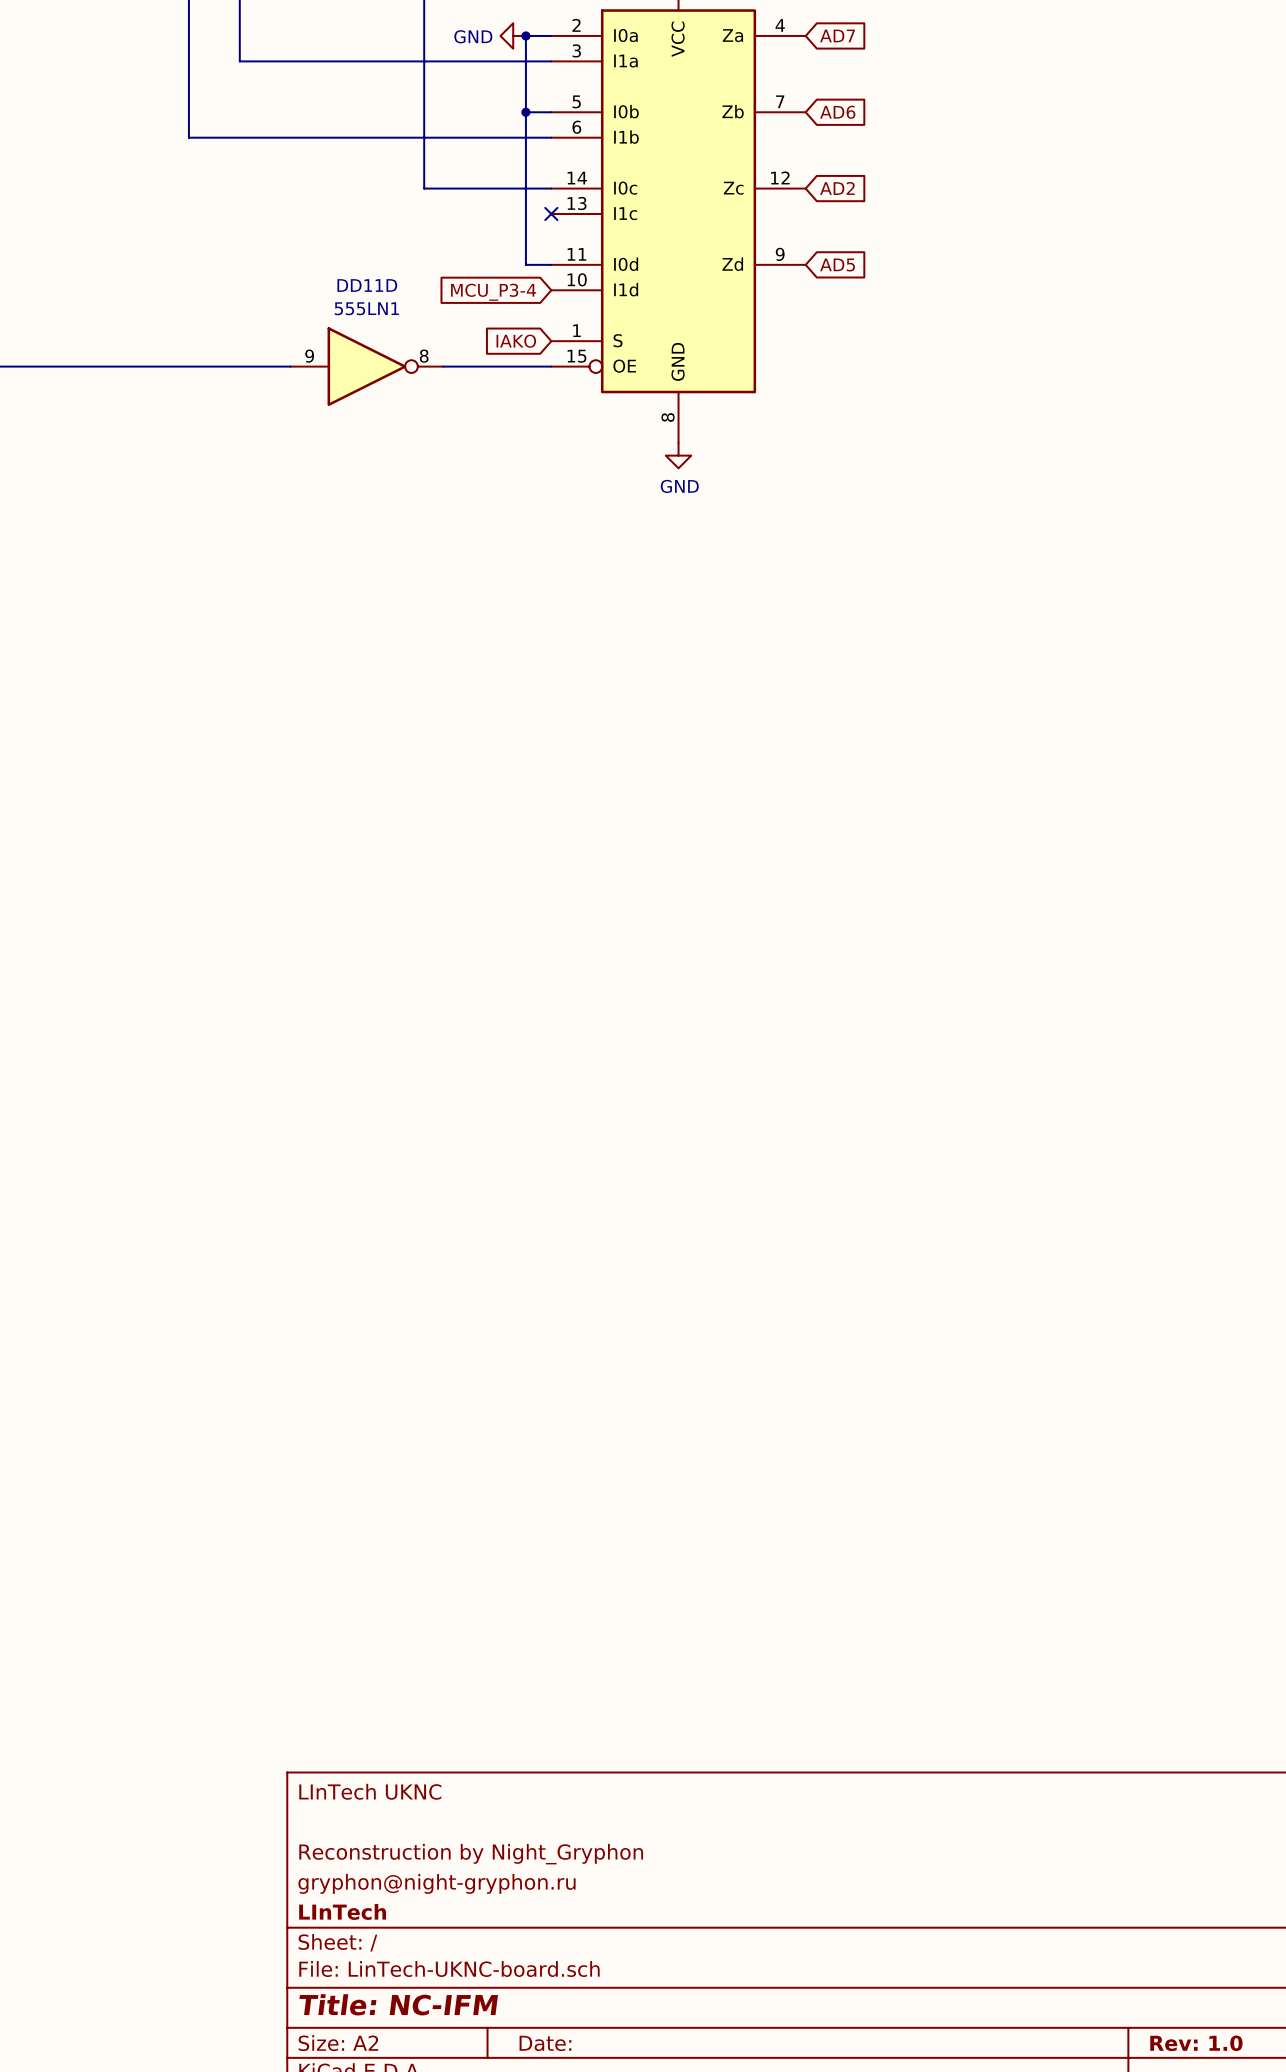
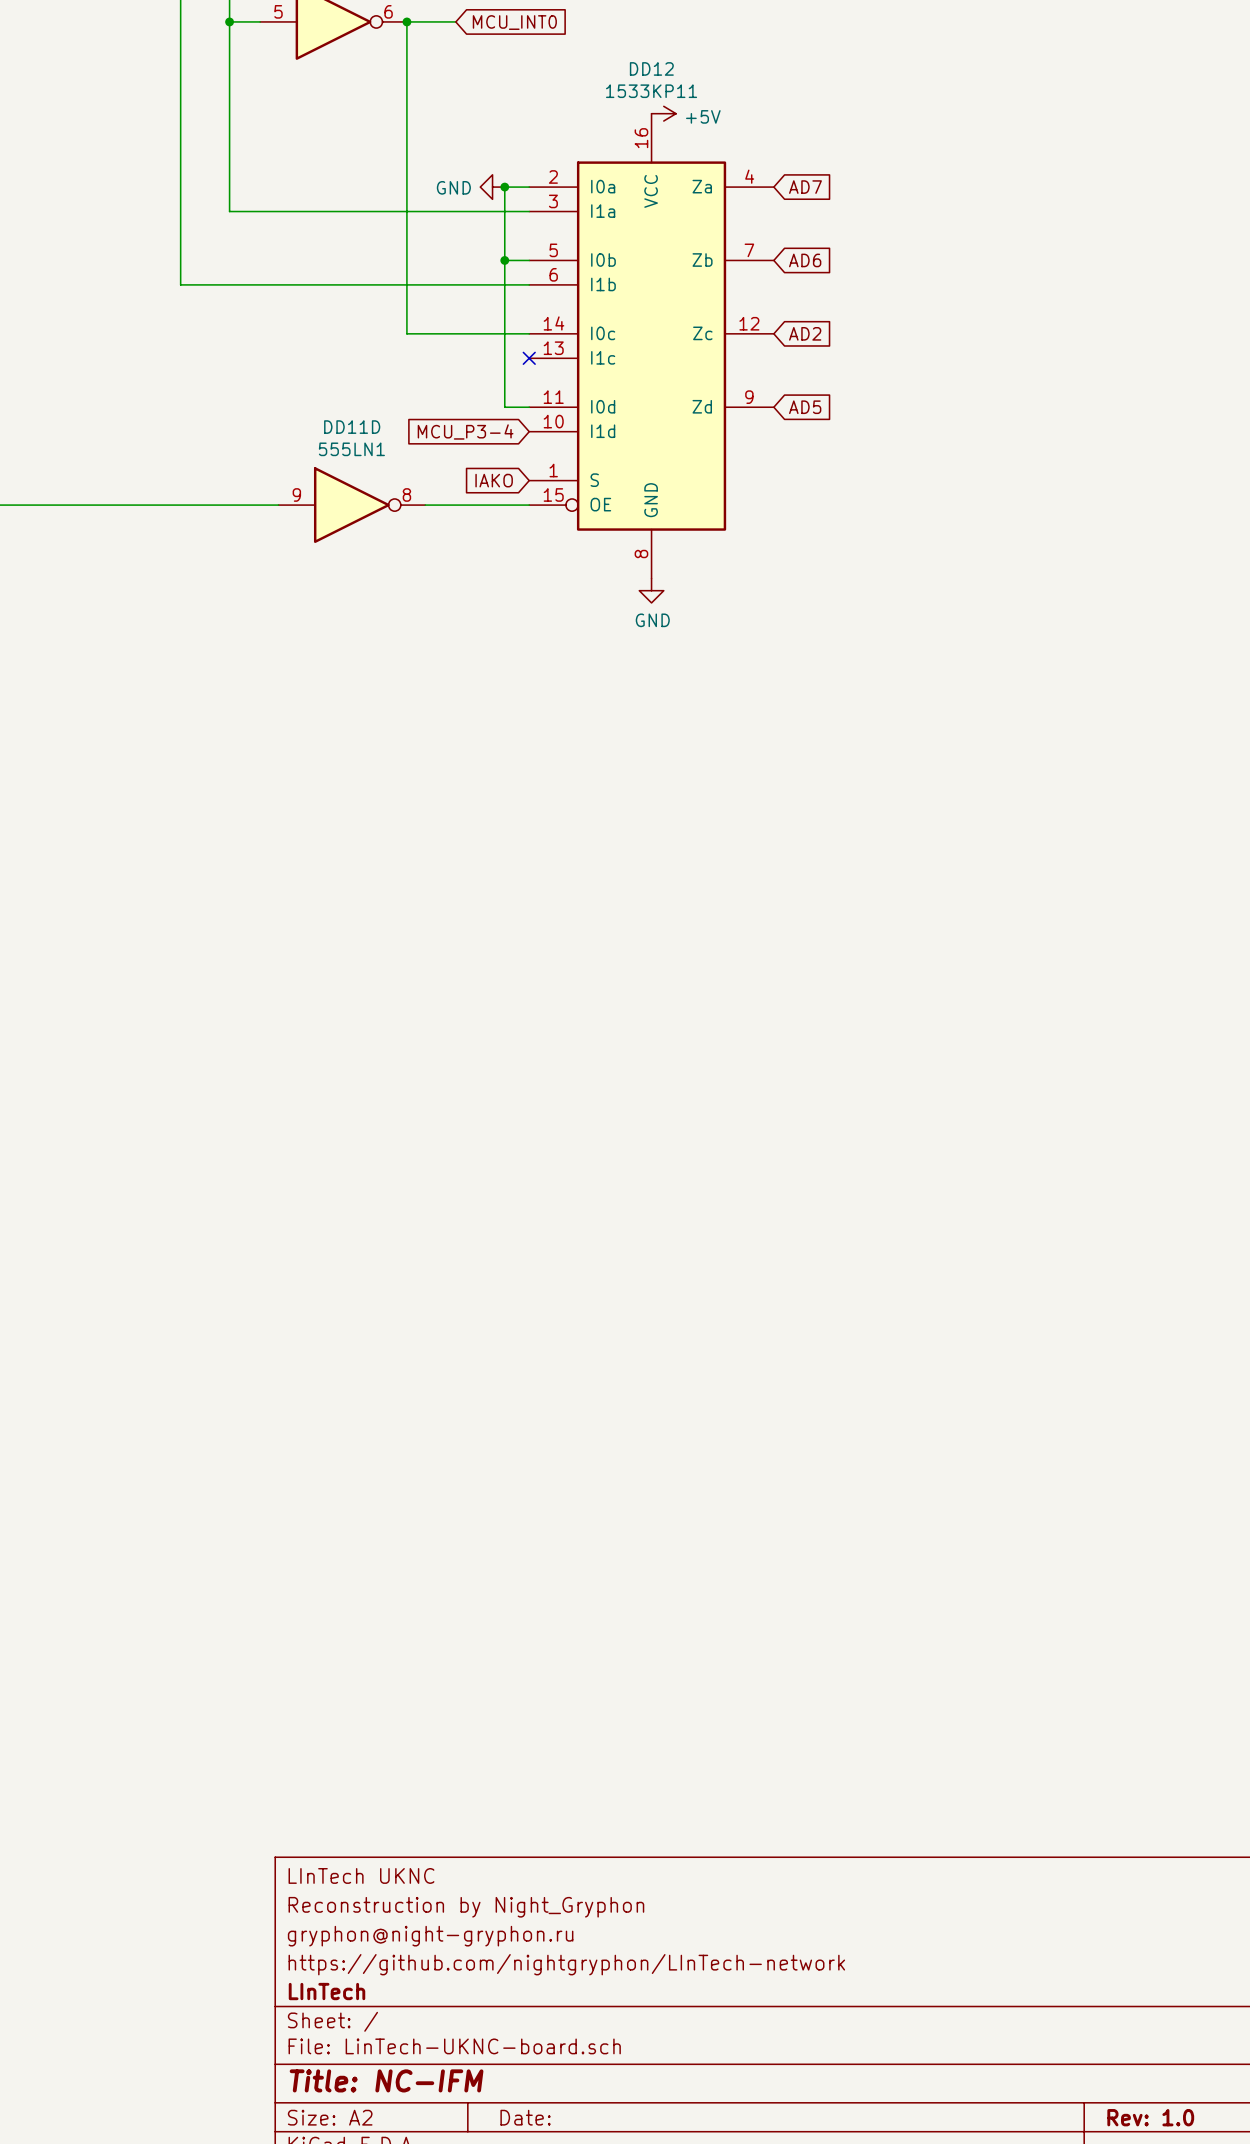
title block: none -> Reconstruction by Night_Gryphon (466, 1907)
title block: Reconstruction by Night_Gryphon (471, 1854) -> gryphon@night-gryphon.ru (430, 1936)
title block: gryphon@night-gryphon.ru (436, 1883) -> https://github.com/nightgryphon/LInTech-network (566, 1964)

